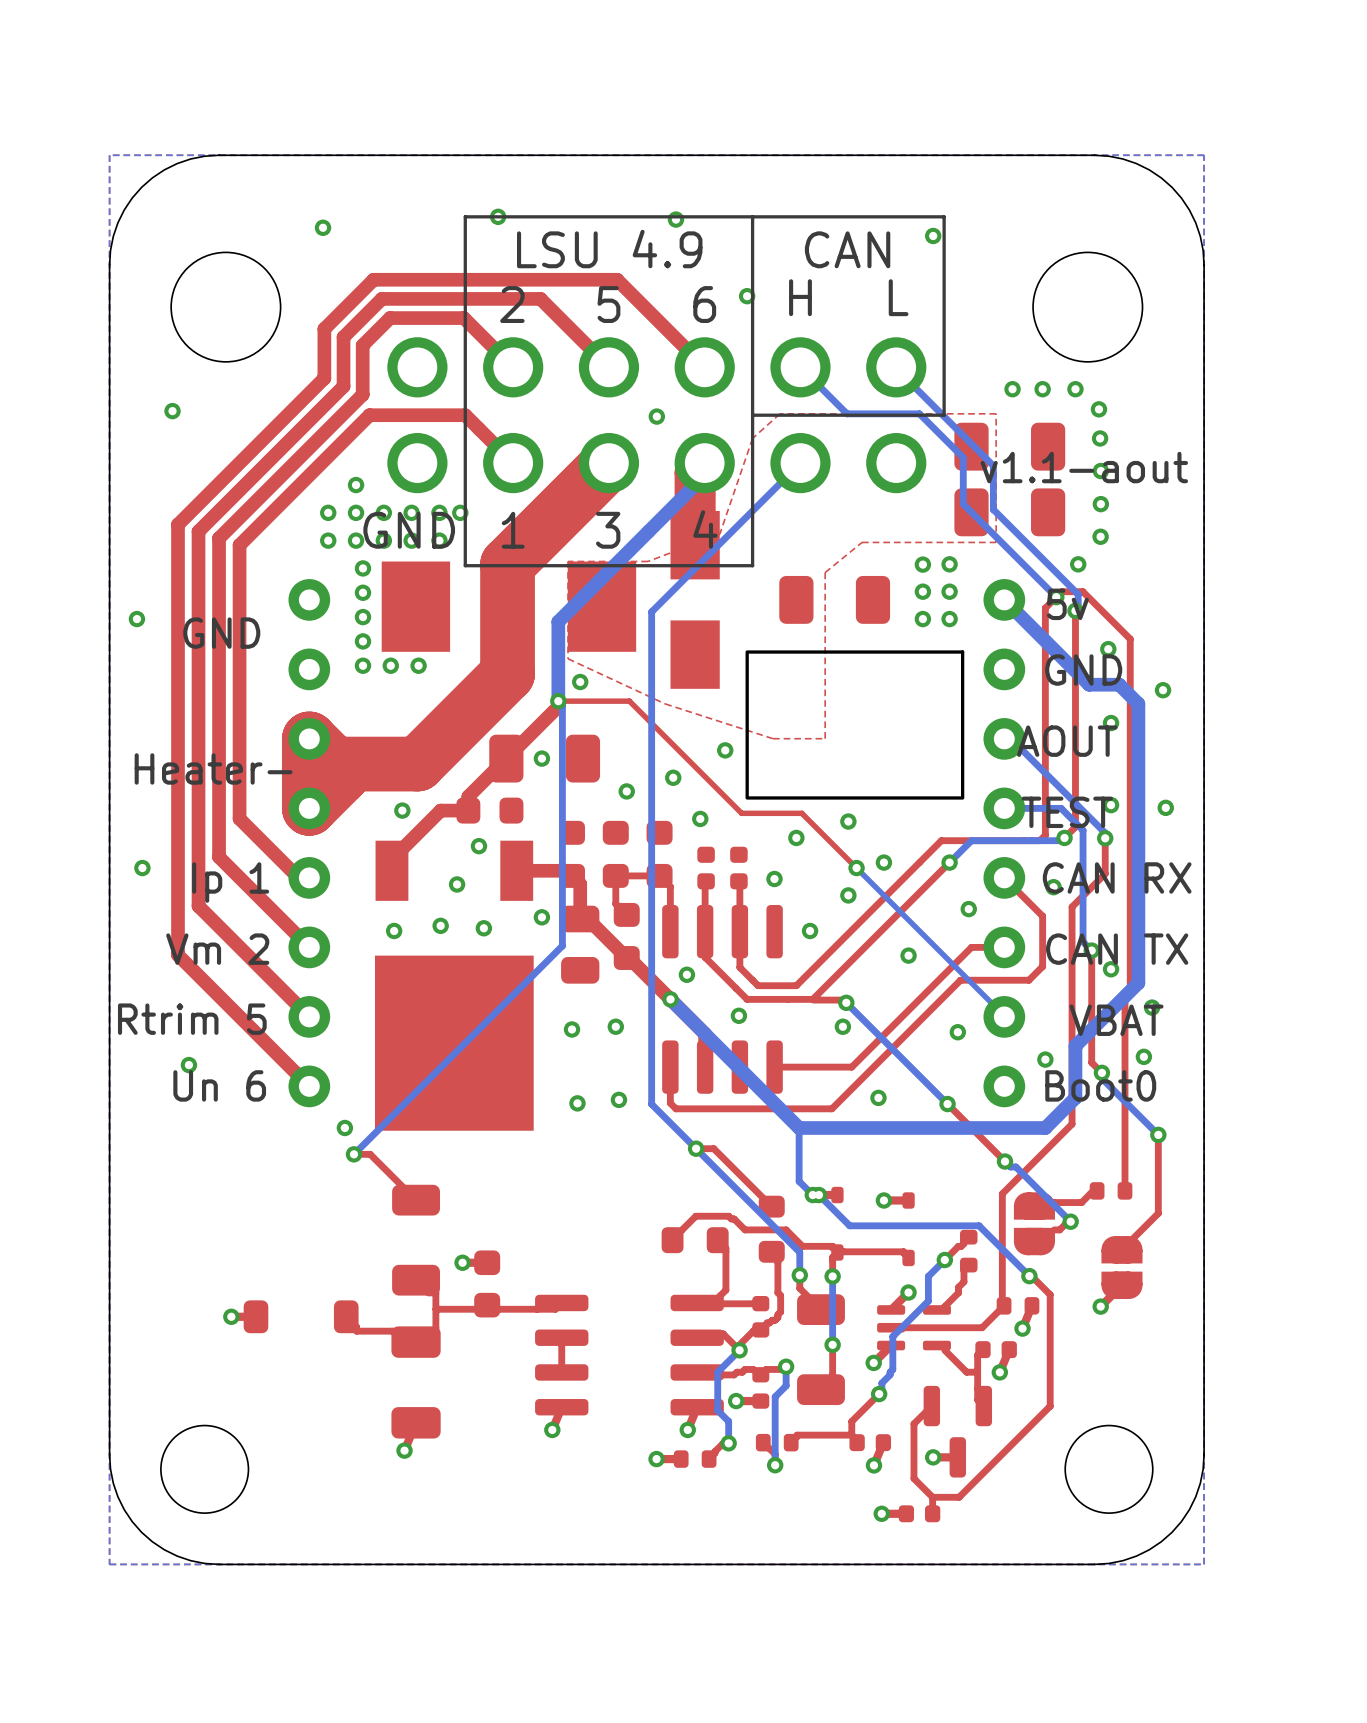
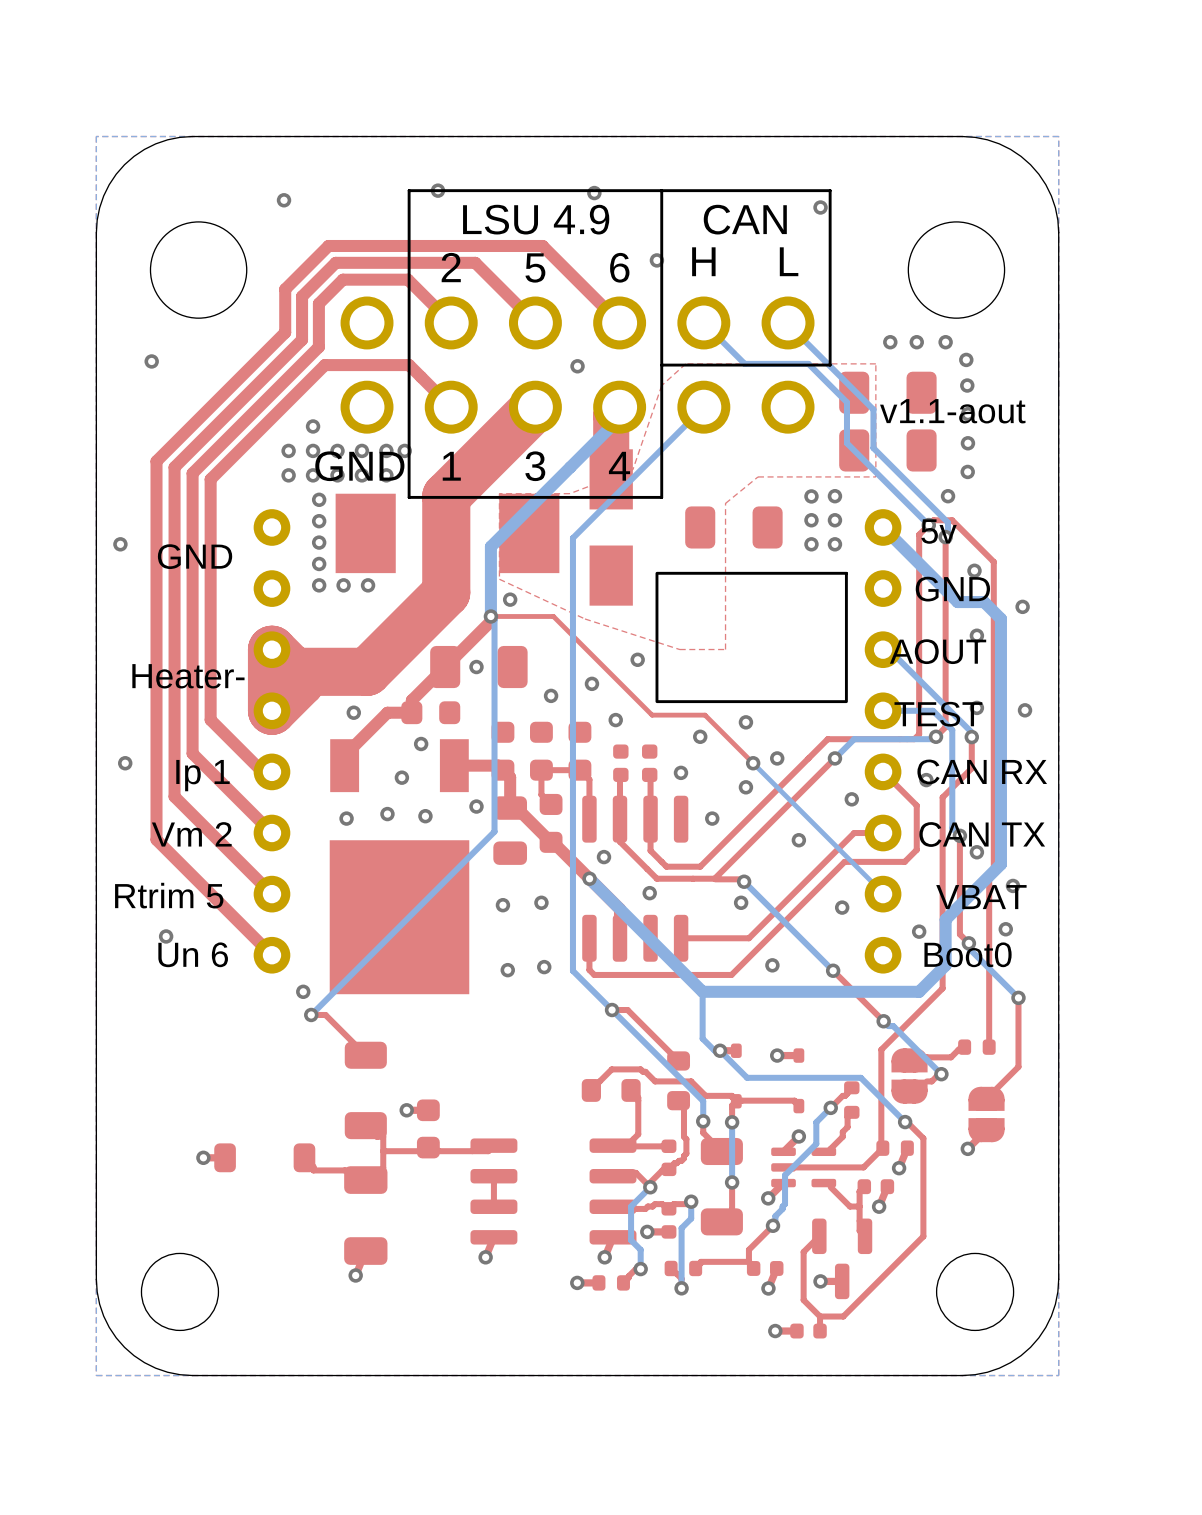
via: (812, 1195) -> none

